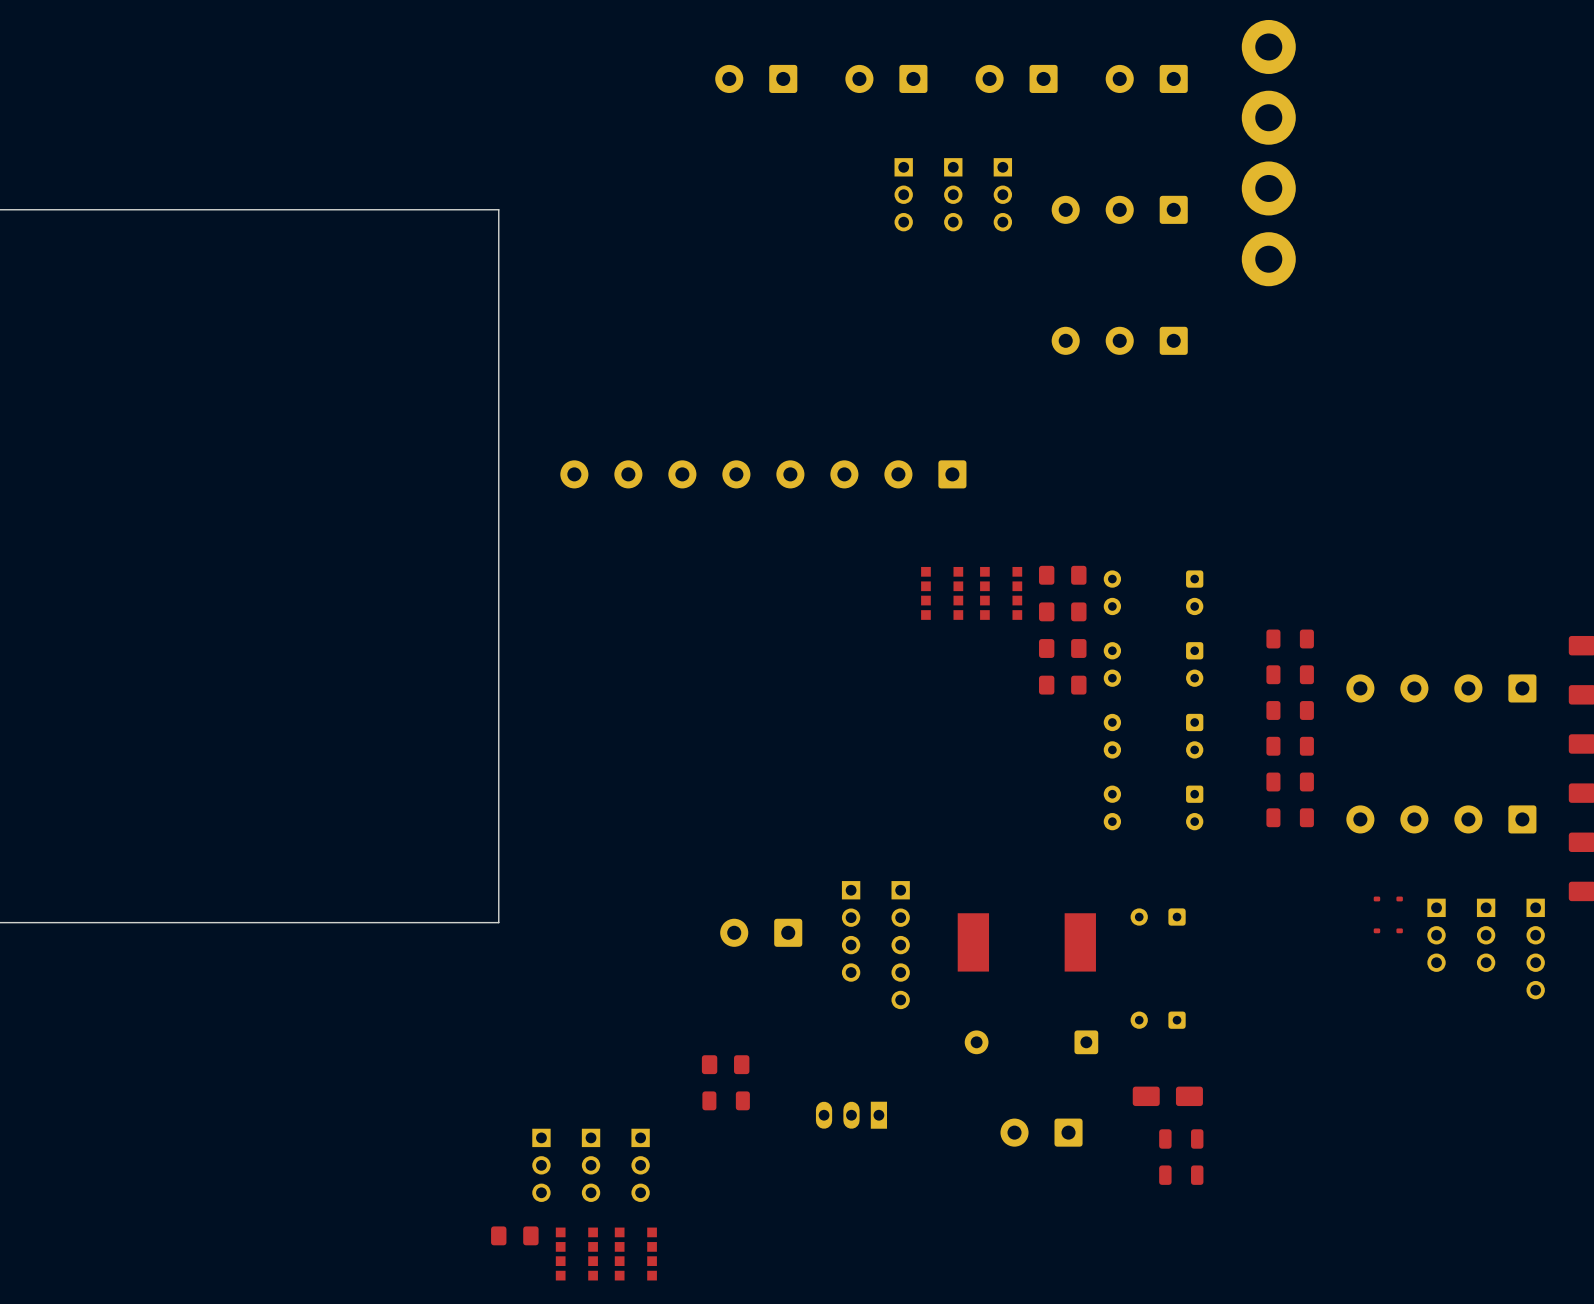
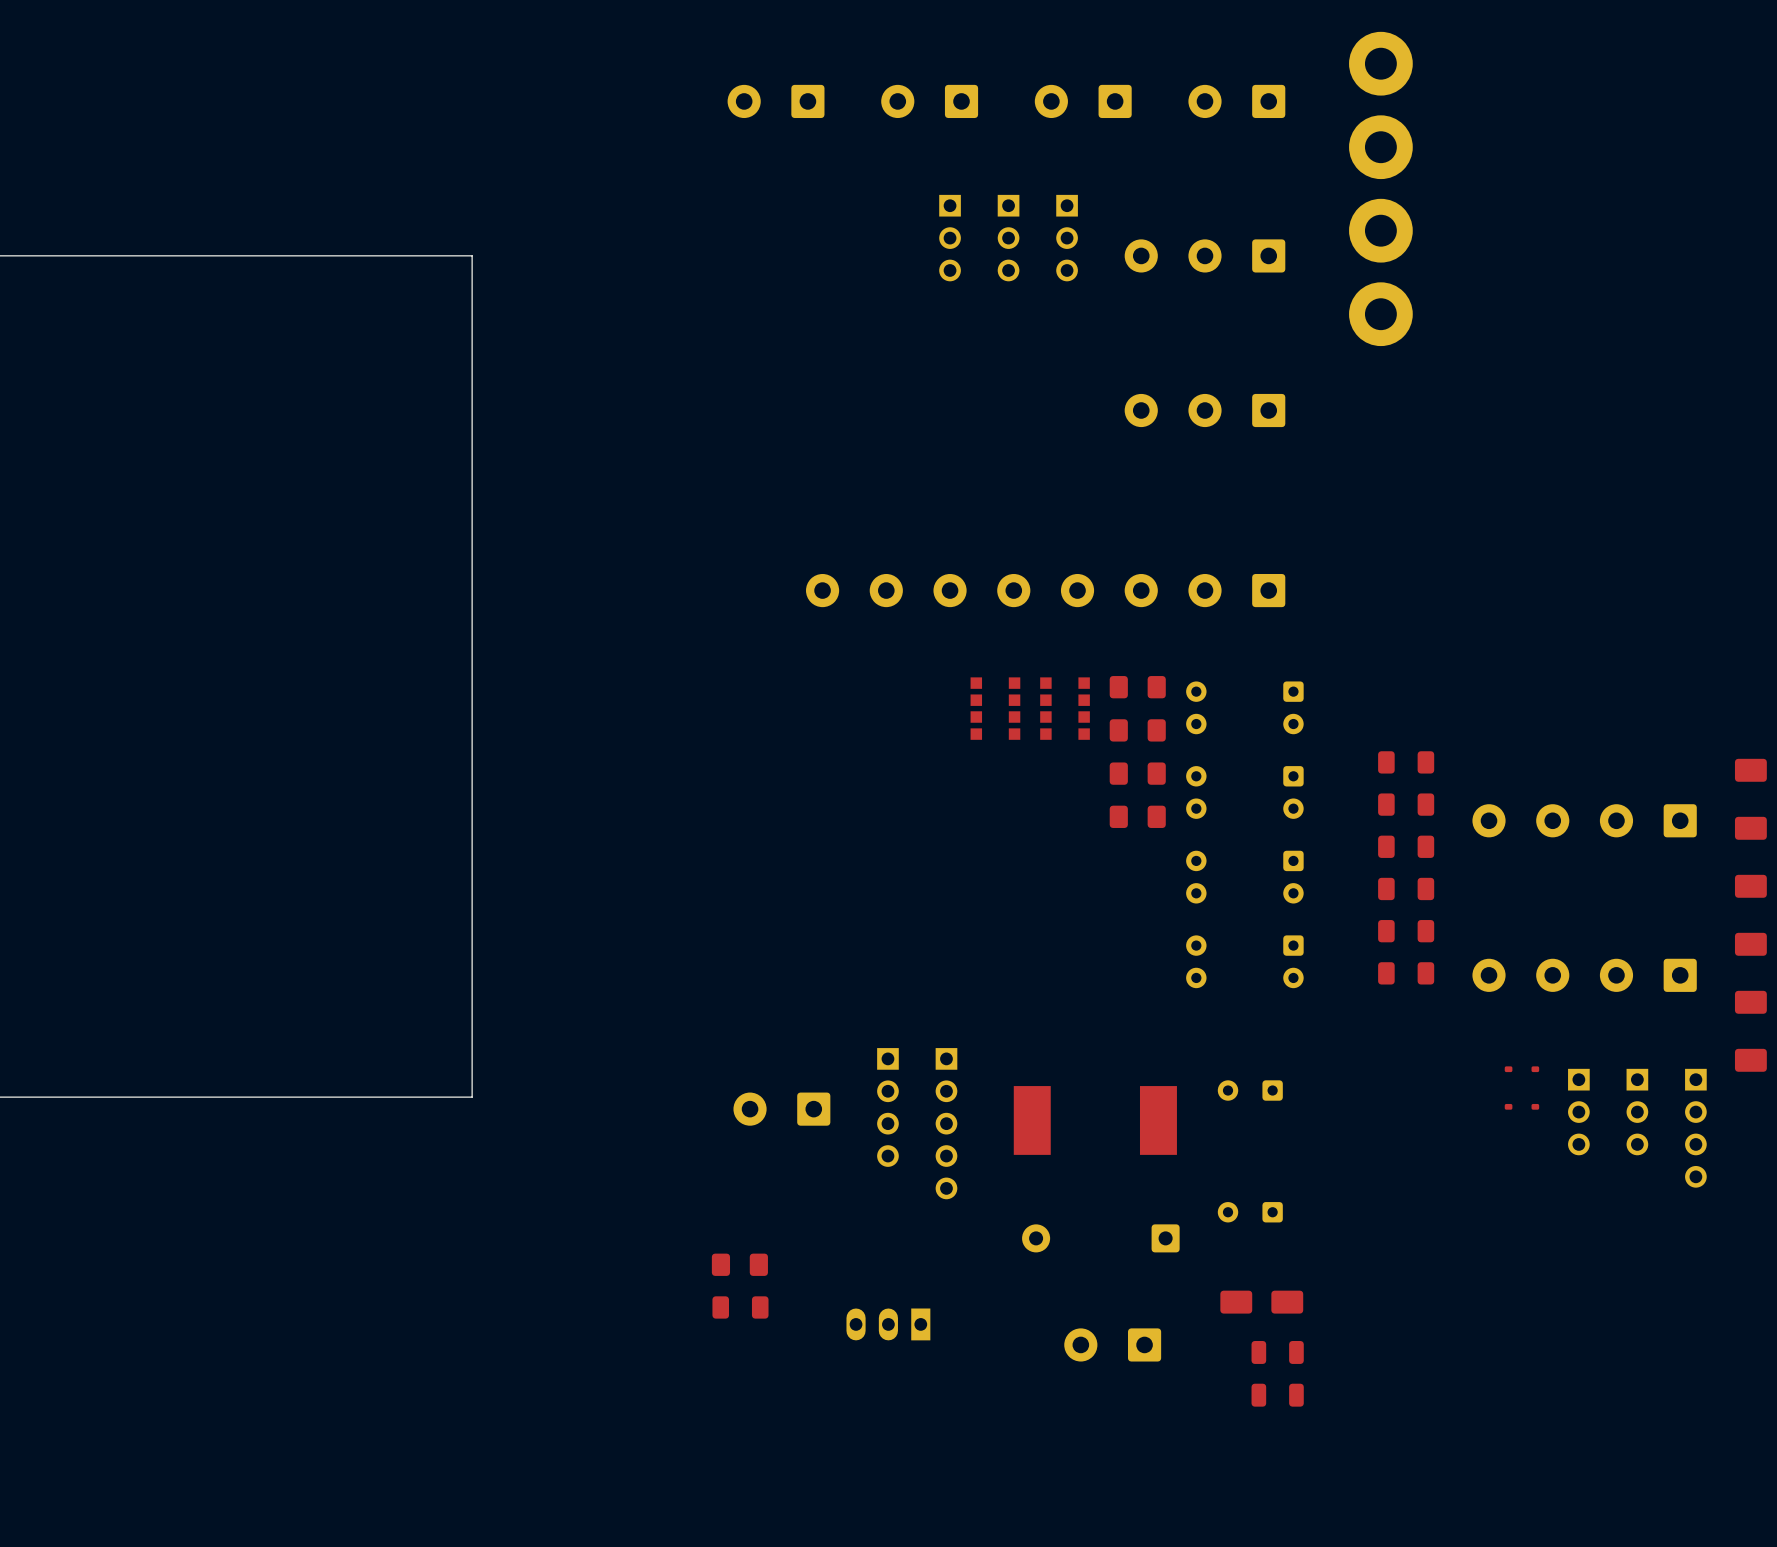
part position: (763, 474) -> (1045, 590)
part: (541, 1165) -> none
part: (591, 1165) -> none
part: (640, 1165) -> none
part: (514, 1235) -> none
part: (576, 1254) -> none
part: (635, 1254) -> none

